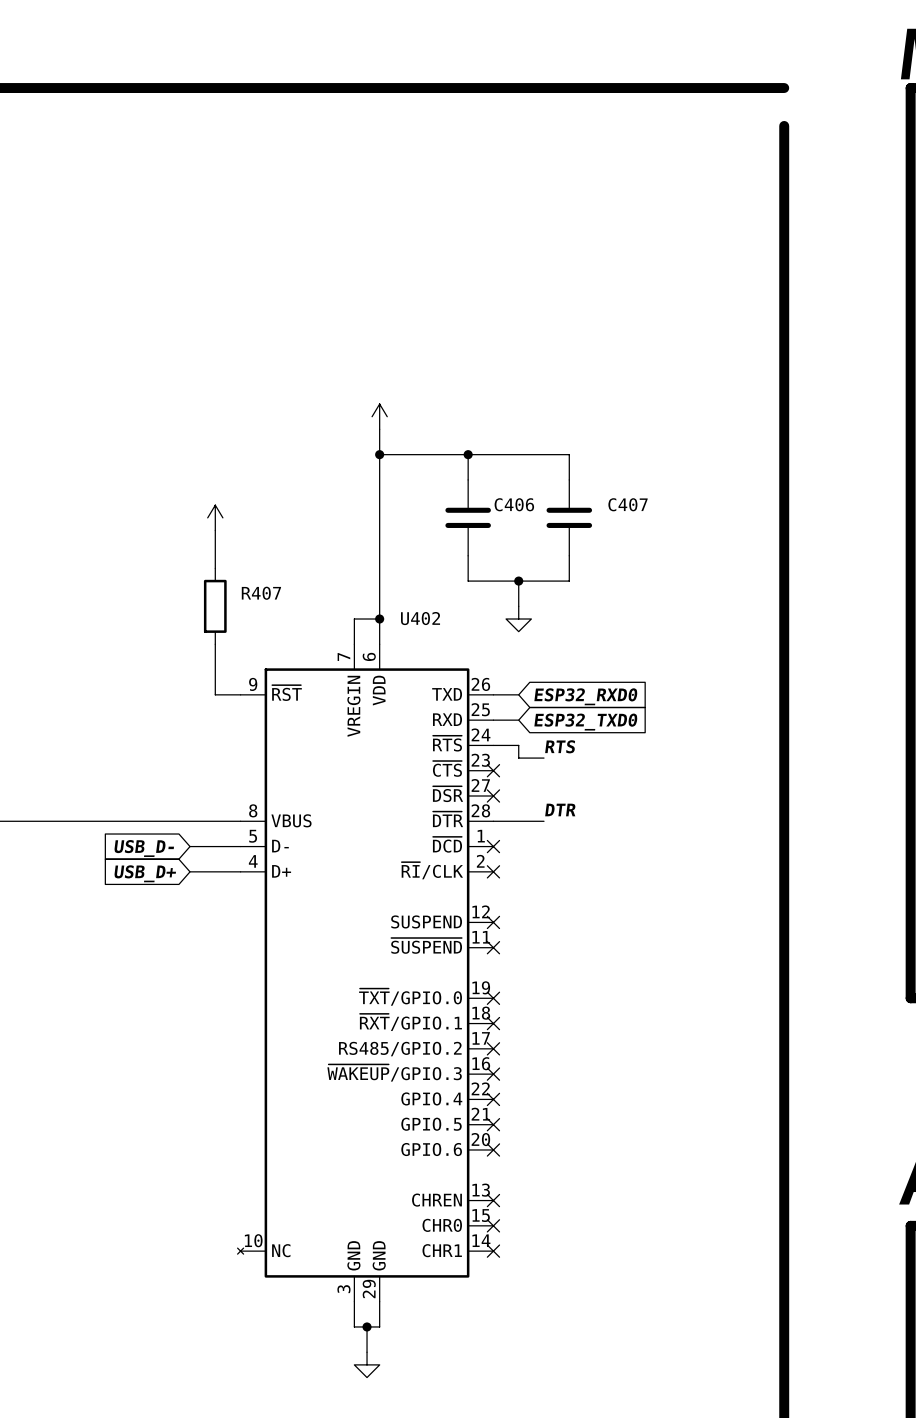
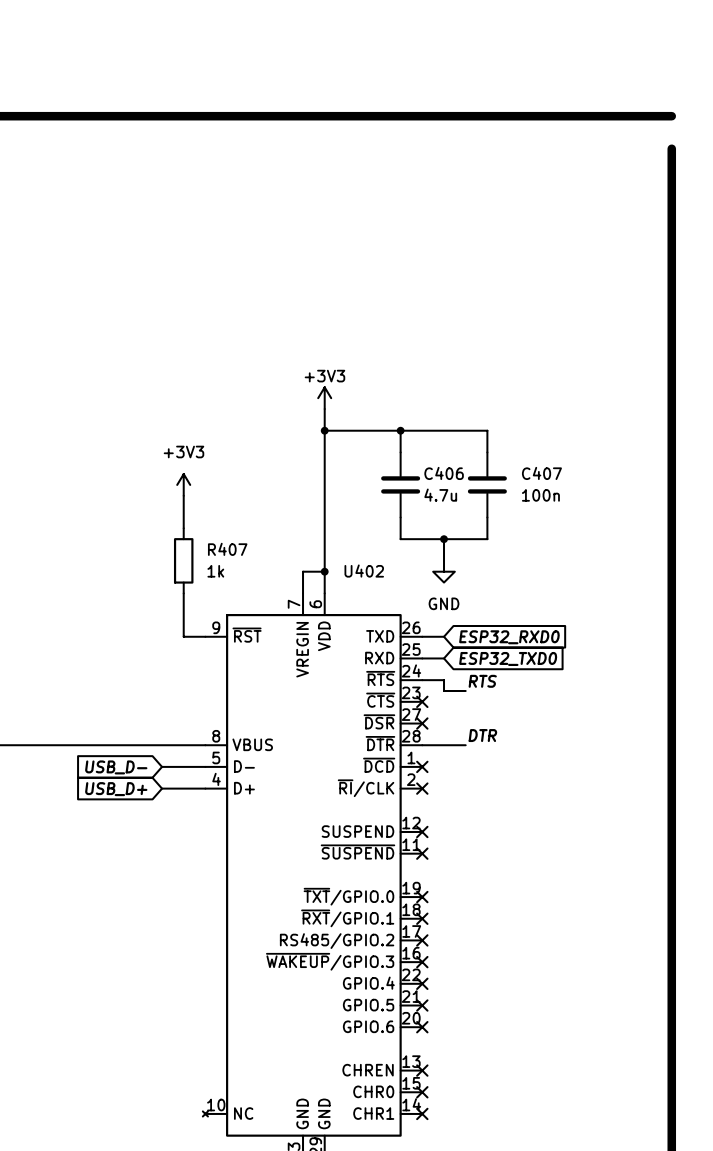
power symbol text: none -> +3V3 (324, 376)
power symbol text: none -> +3V3 (183, 452)
C406 value: none -> 4.7u (440, 495)
C407 value: none -> 100n (540, 495)
R407 value: none -> 1k (215, 571)
power symbol text: none -> GND (444, 603)

